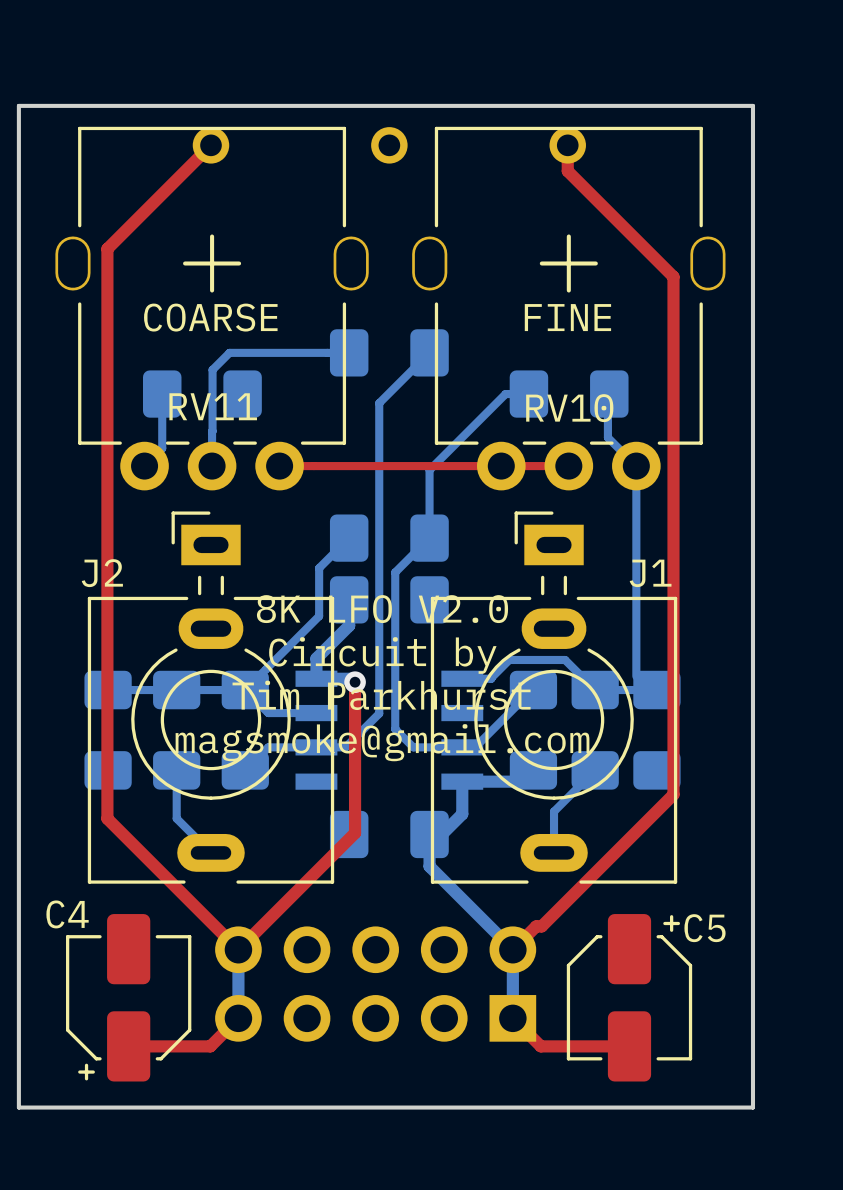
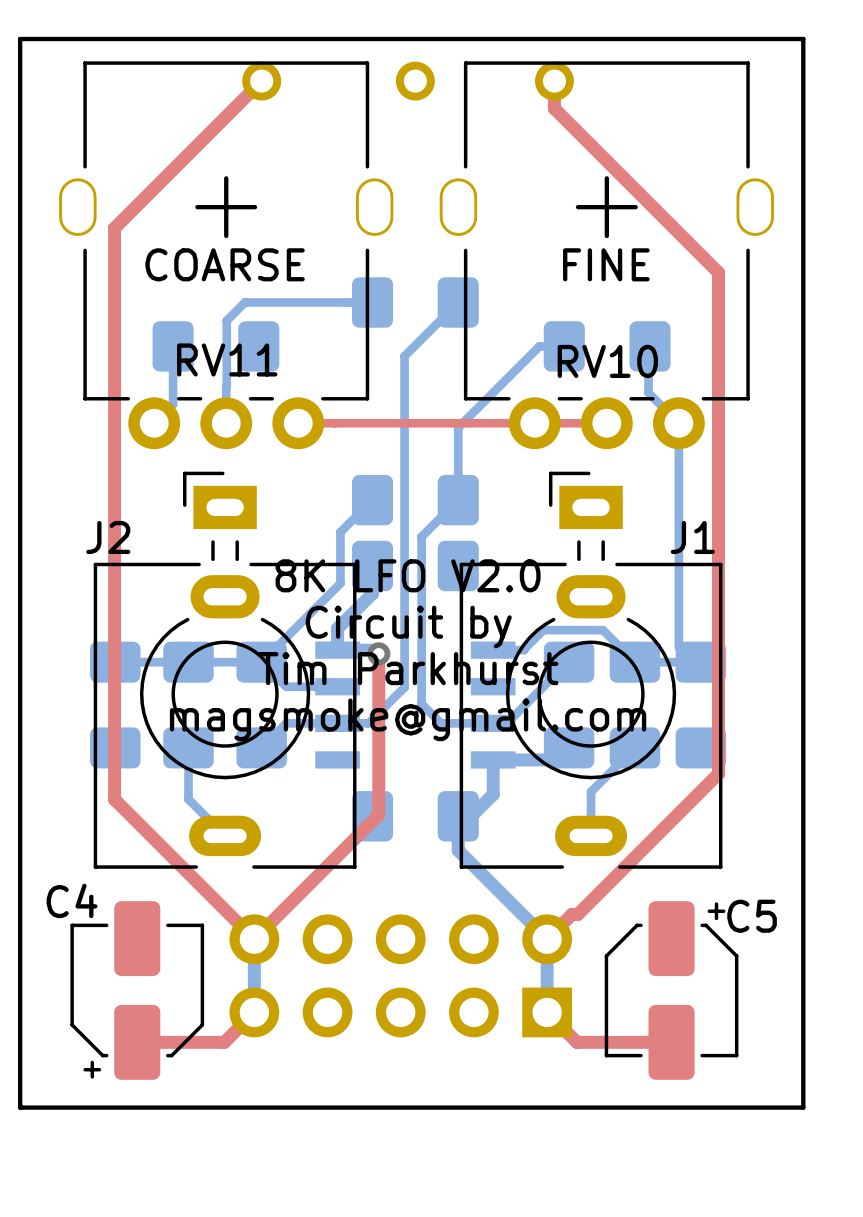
top track: (210, 145) (107, 248) (107, 283) -> (261, 81) (114, 228)
part position: (210, 145) -> (261, 81)
top track: (567, 145) (567, 171) (673, 276) (673, 324) -> (554, 81) (554, 108) (718, 272)
part position: (567, 145) -> (554, 81)

